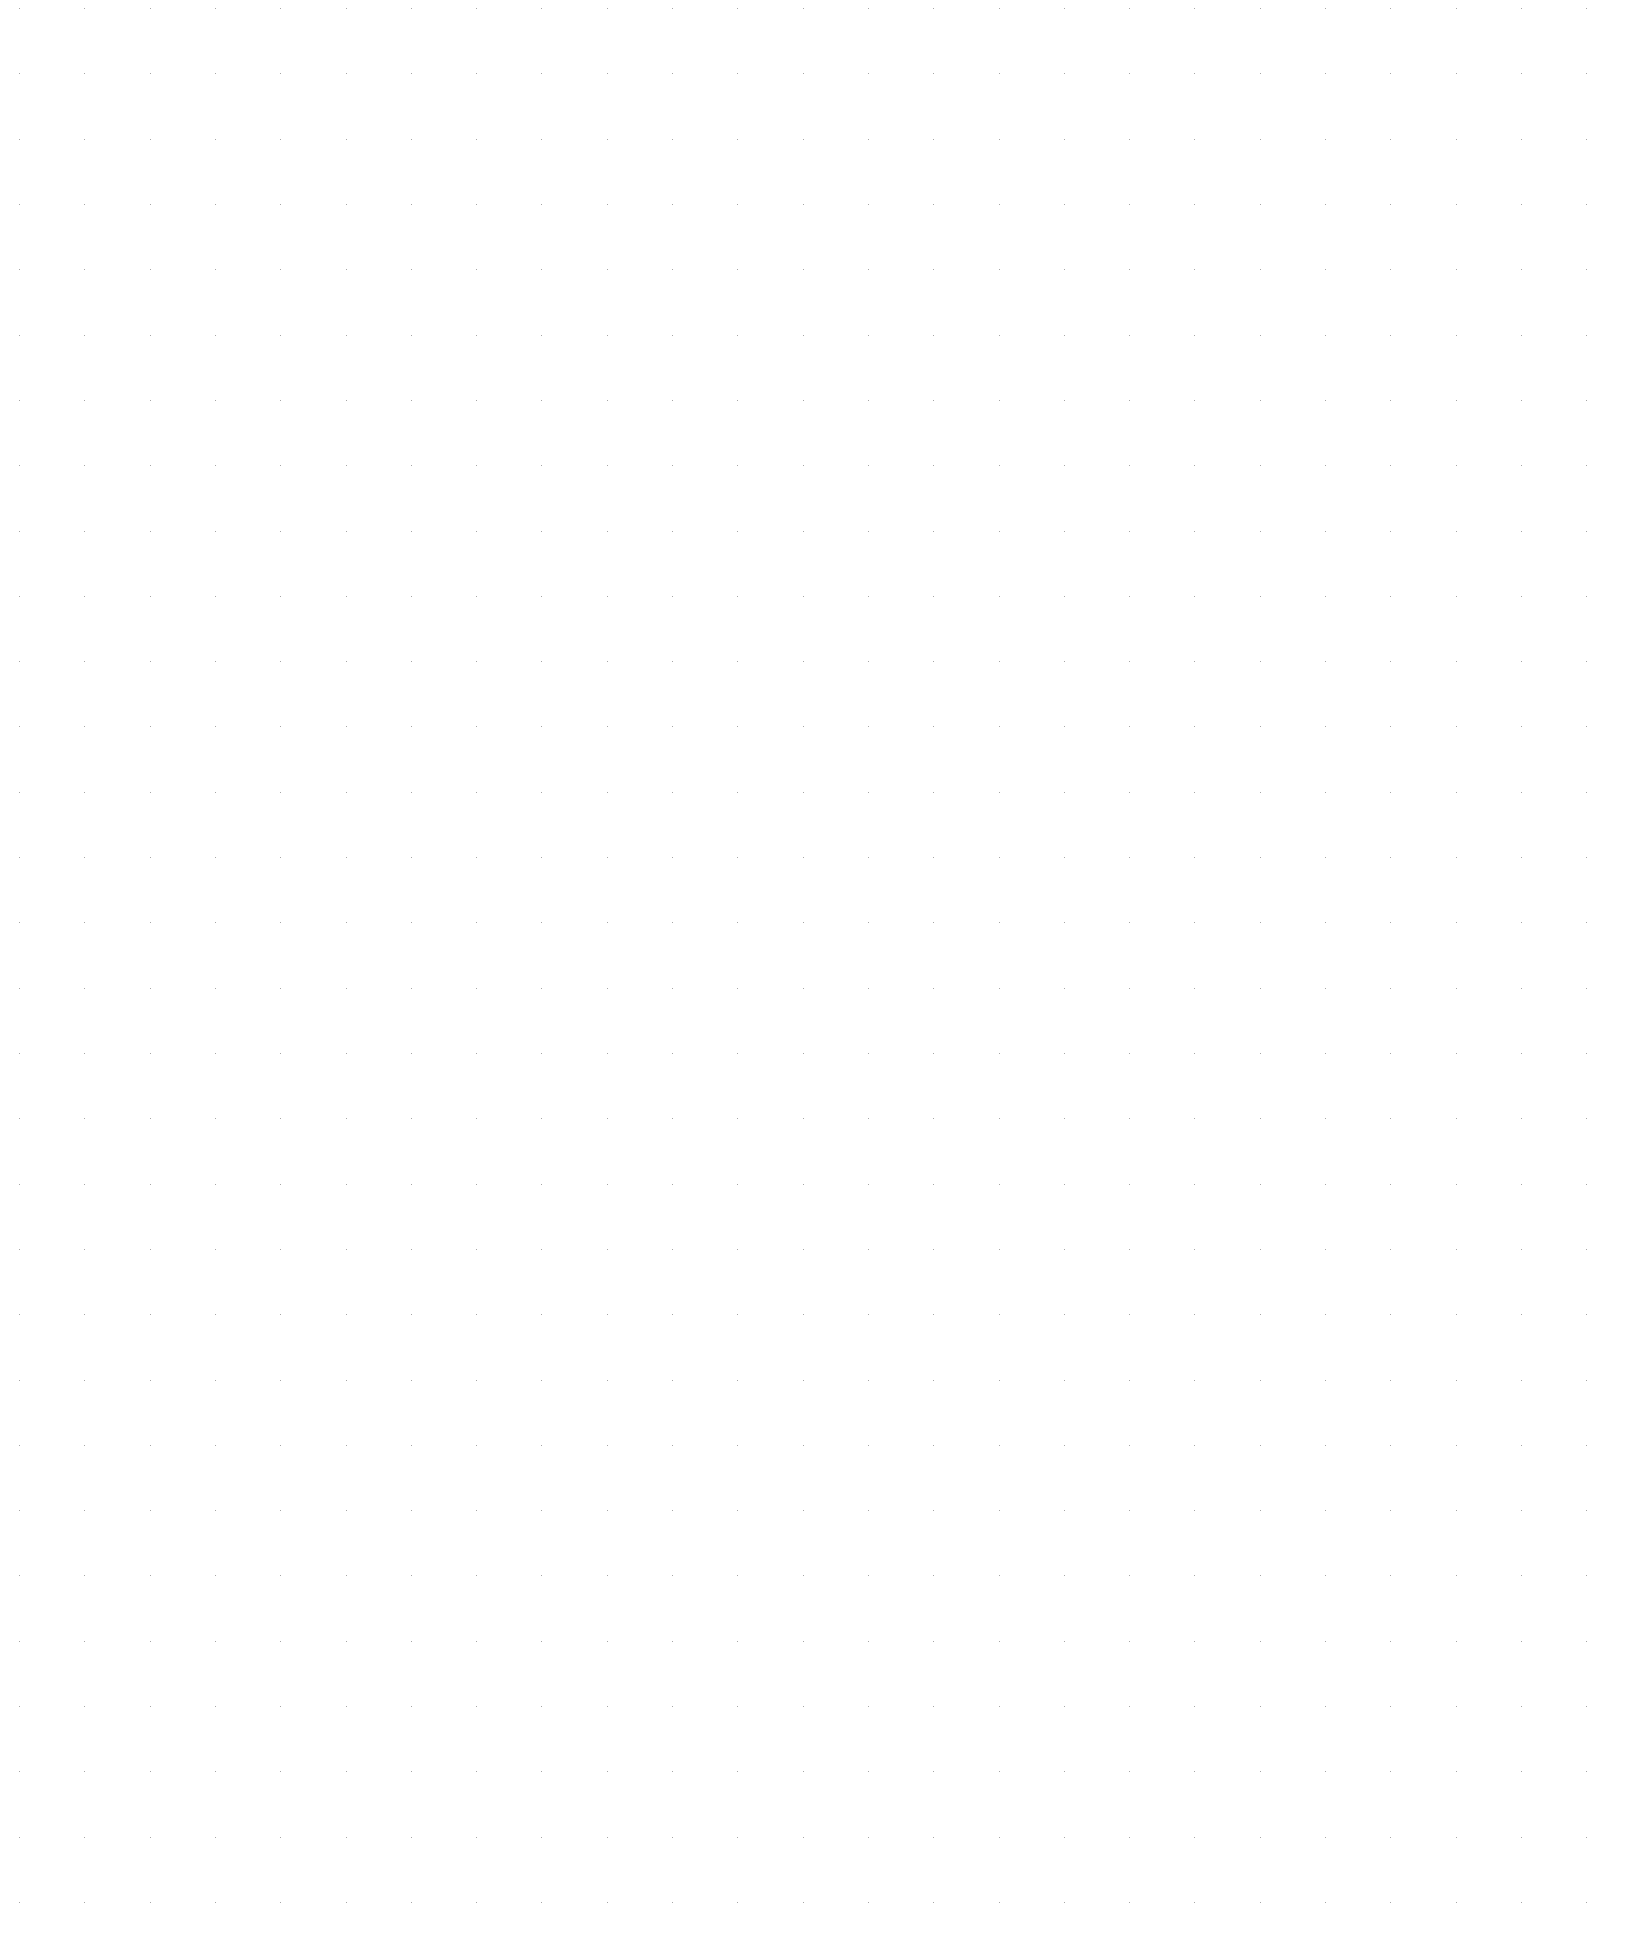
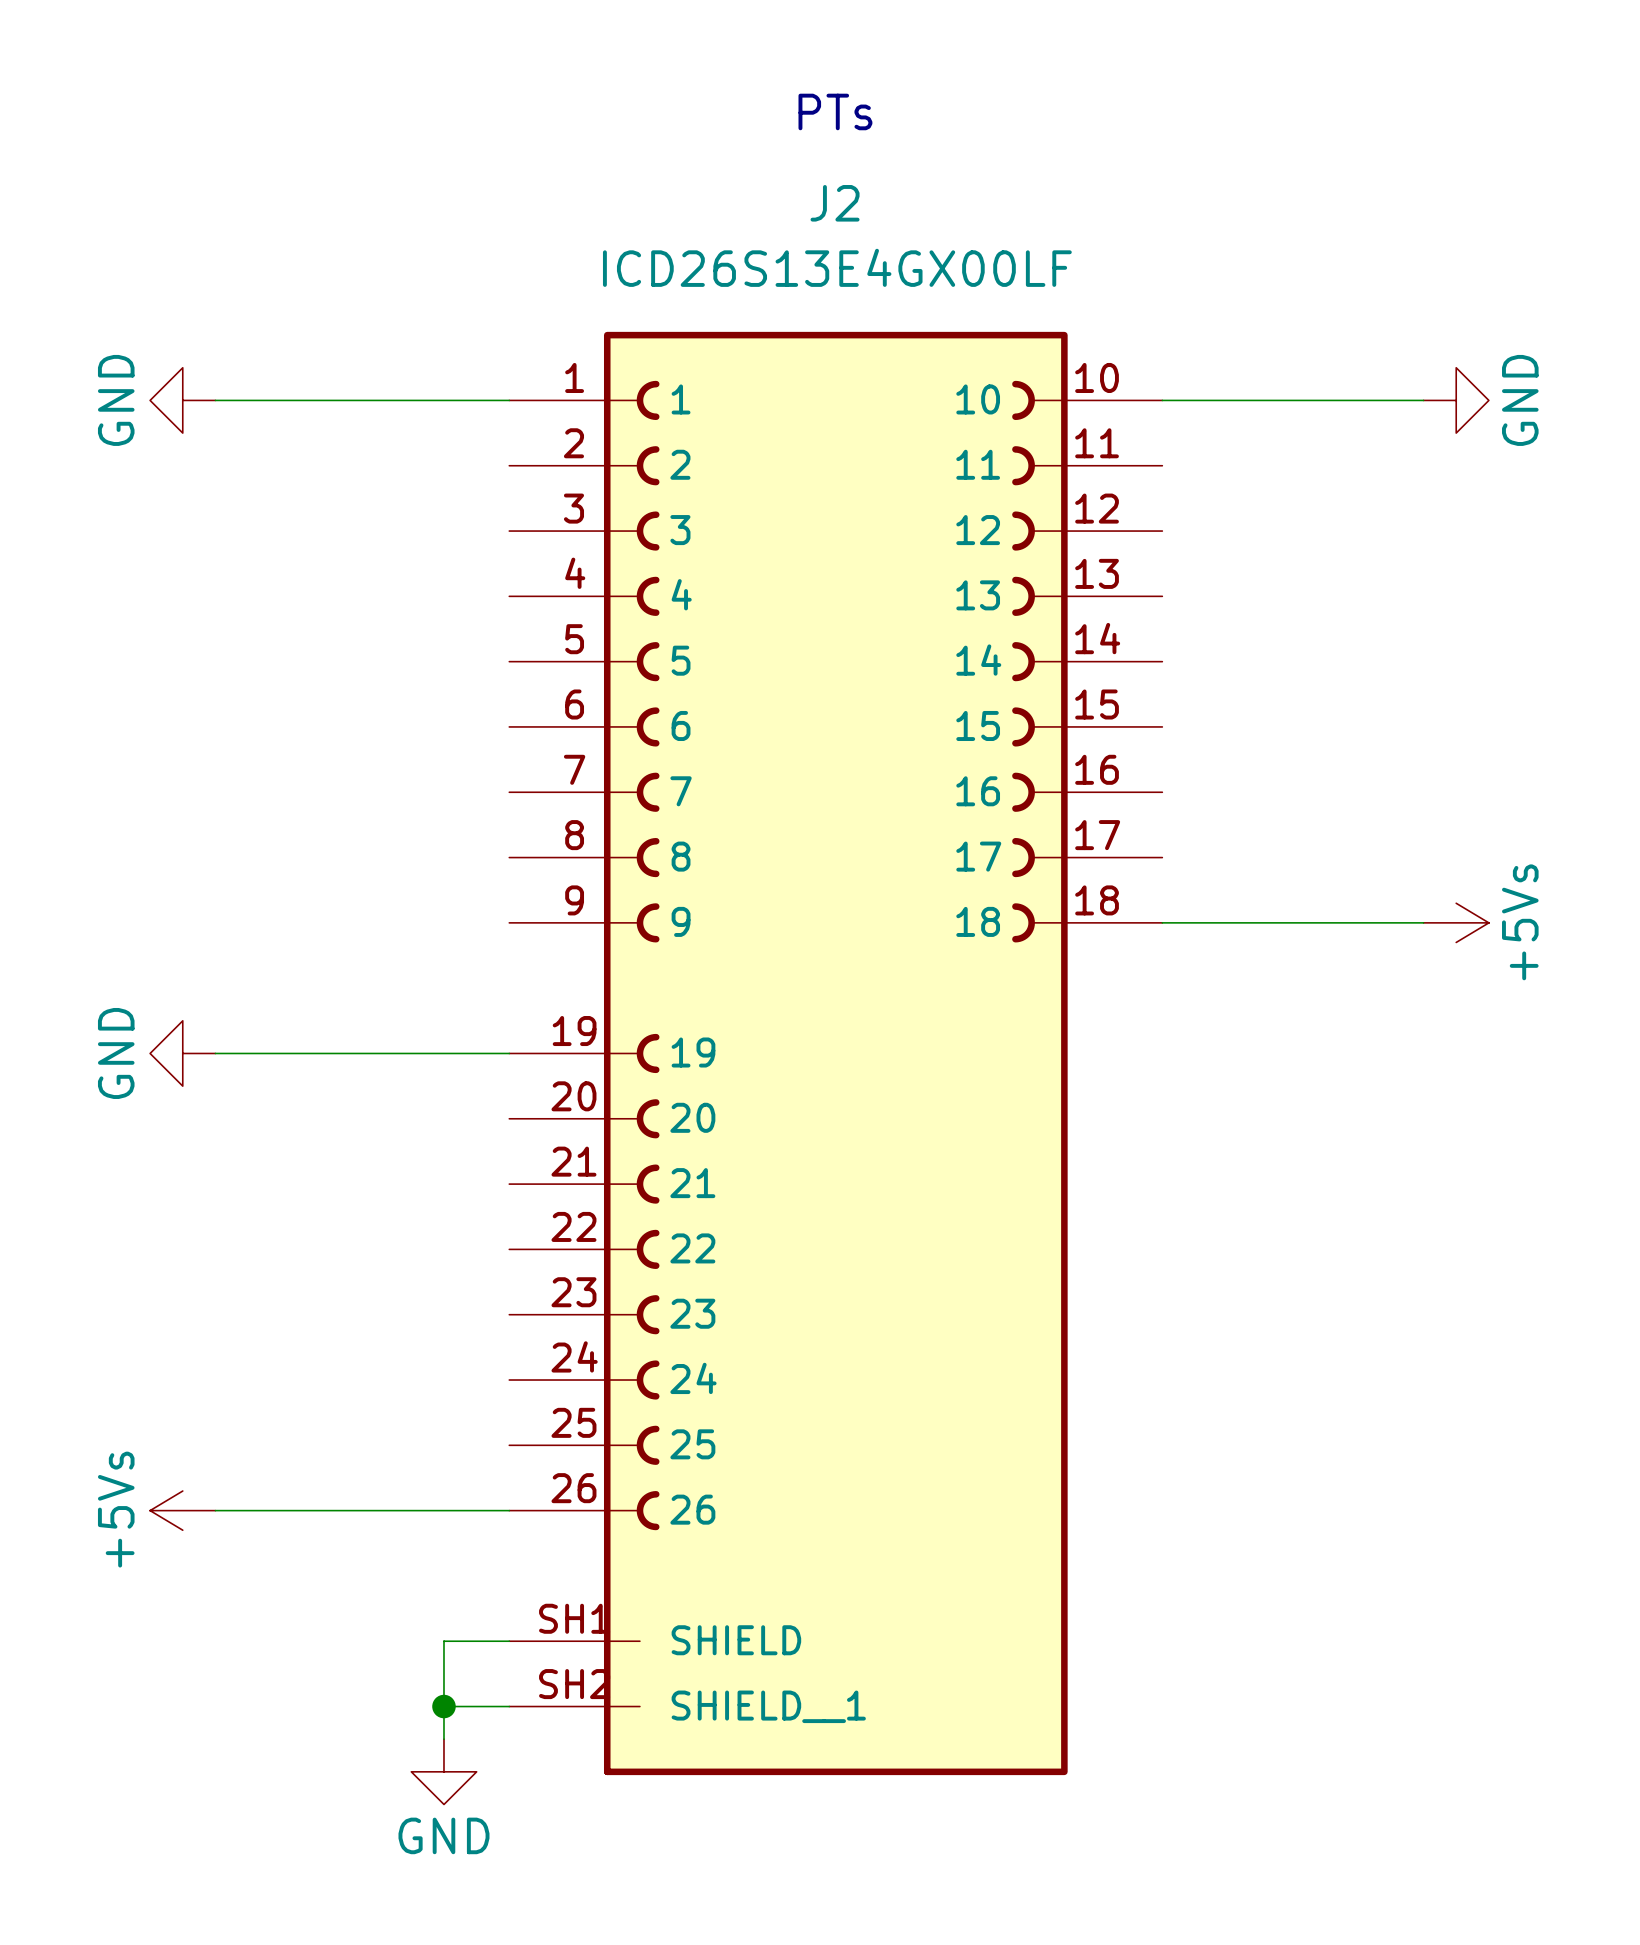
text: none -> PTs (835, 111)
power symbol: none -> GND (182, 400)
wire: none -> (215, 400) (509, 400)
wire: none -> (1162, 400) (1423, 400)
power symbol: none -> GND (1456, 400)
wire: none -> (1162, 922) (1423, 922)
power symbol: none -> +5Vs (1456, 922)
power symbol: none -> GND (182, 1053)
wire: none -> (215, 1053) (509, 1053)
J2: none -> ICD26S13E4GX00LF (835, 1053)
power symbol: none -> +5Vs (182, 1510)
wire: none -> (215, 1510) (509, 1510)
wire: none -> (509, 1641) (443, 1641) (443, 1739)
wire: none -> (443, 1706) (509, 1706)
junction: none -> (443, 1706)
power symbol: none -> GND (443, 1771)

